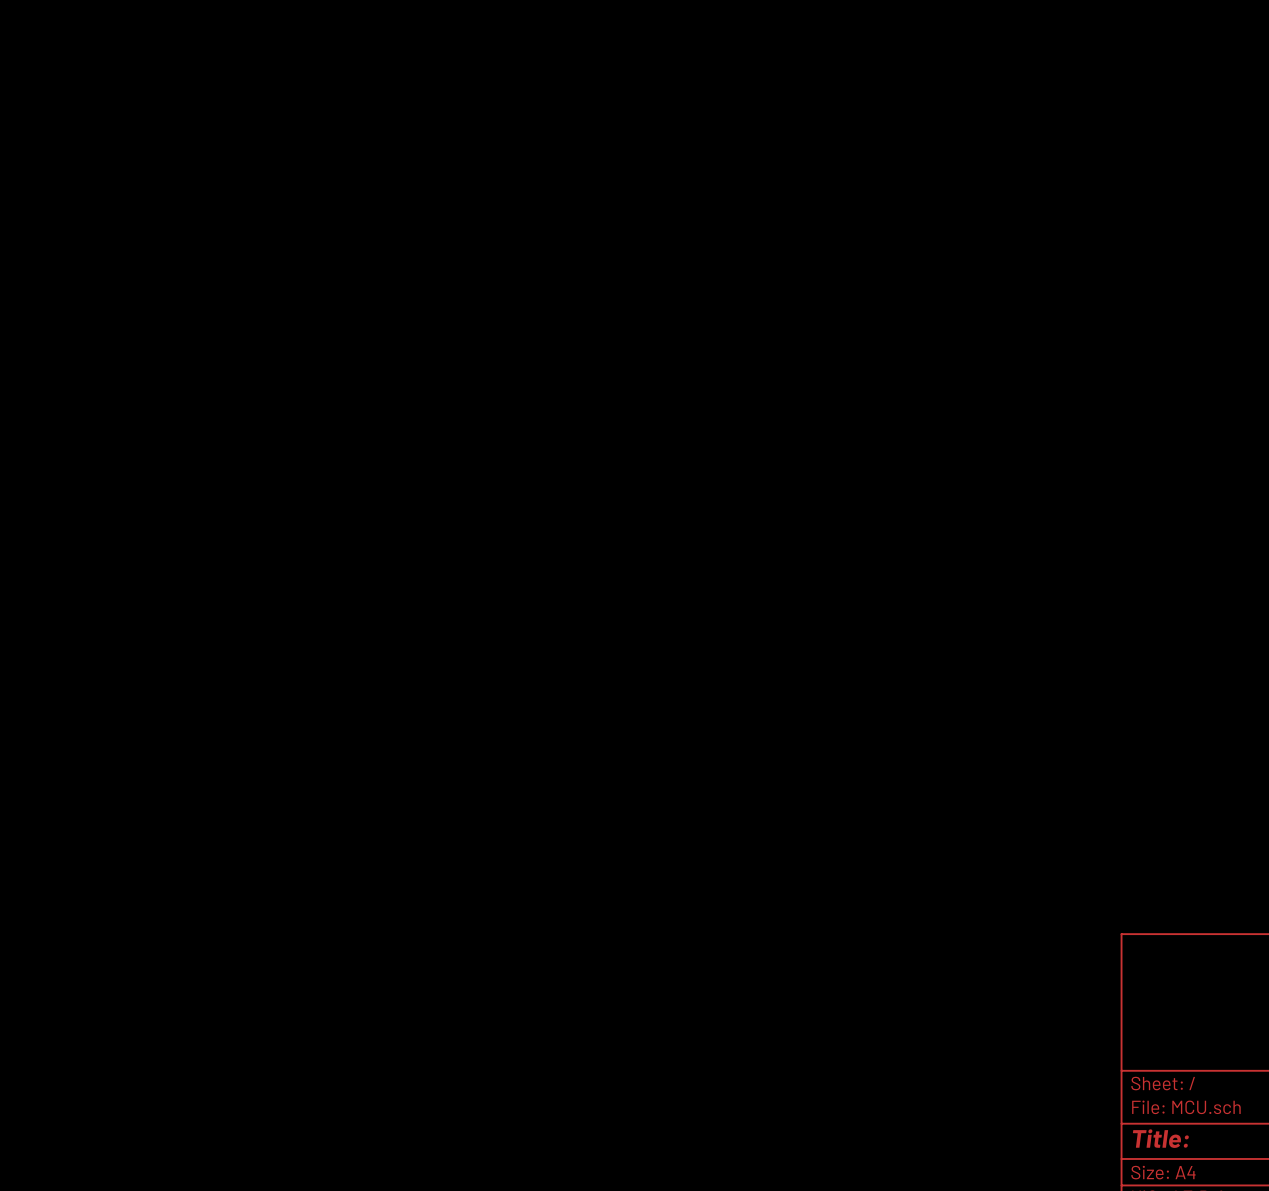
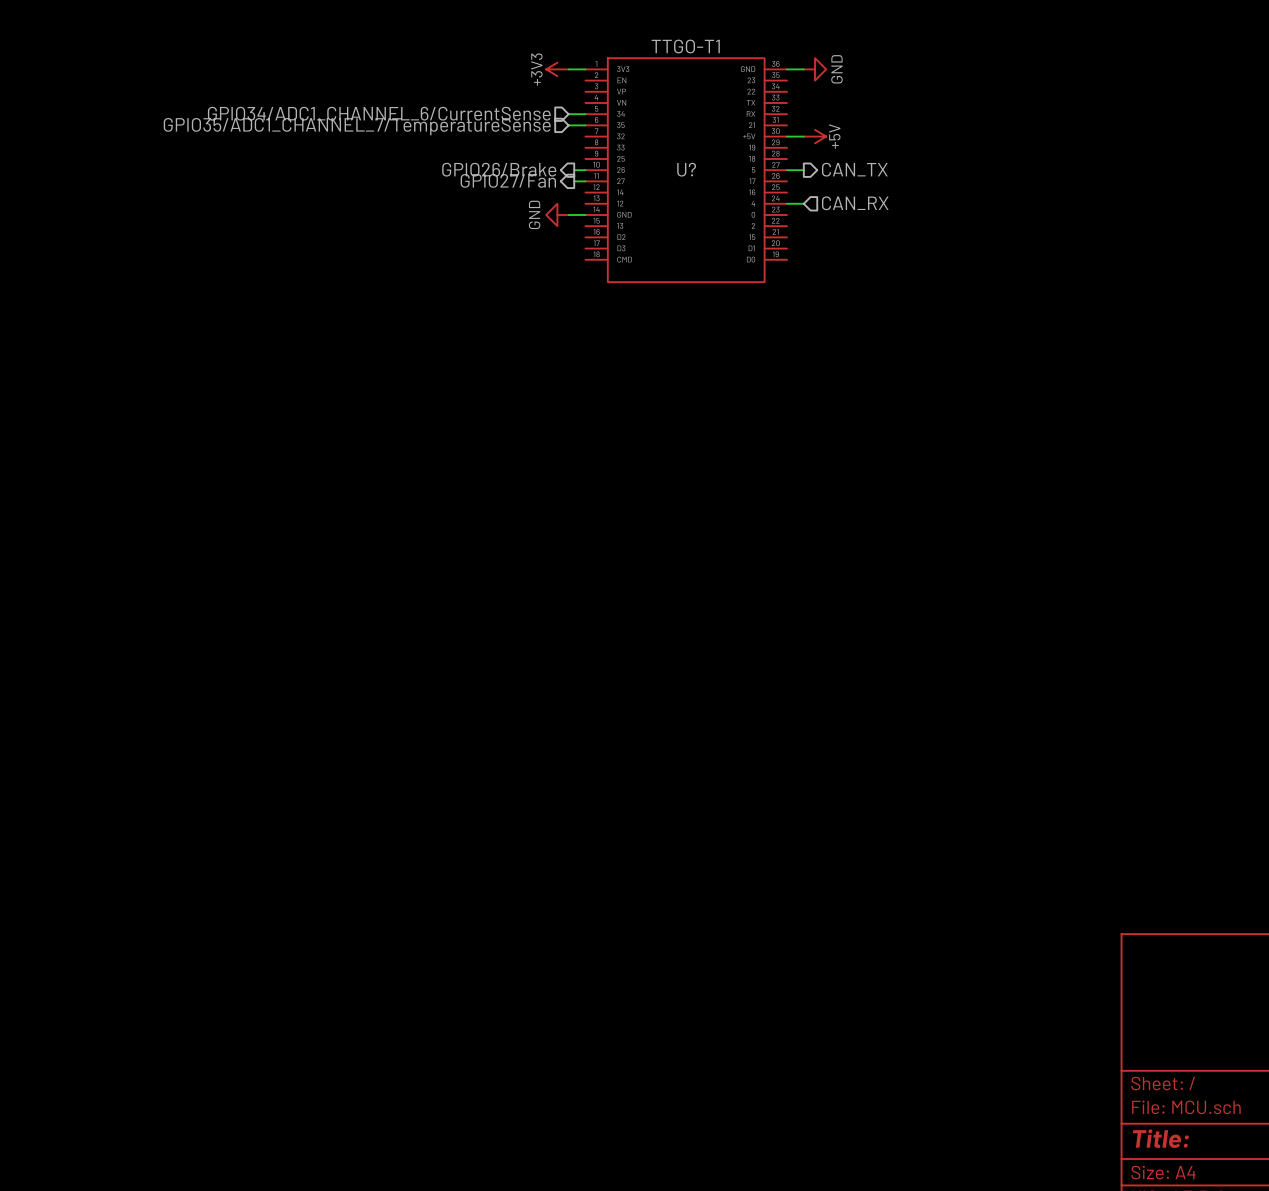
power symbol: none -> +3V3 (557, 69)
wire: none -> (568, 69) (585, 69)
wire: none -> (787, 69) (803, 69)
power symbol: none -> GND (815, 69)
hierarchical label: none -> GPIO34/ADC1_CHANNEL_6/CurrentSense (379, 113)
wire: none -> (568, 114) (585, 114)
wire: none -> (568, 125) (585, 125)
hierarchical label: none -> GPIO35/ADC1_CHANNEL_7/TemperatureSense (357, 126)
wire: none -> (787, 136) (803, 136)
power symbol: none -> +5V (815, 136)
hierarchical label: none -> GPIO26/Brake (499, 169)
hierarchical label: none -> CAN_TX (854, 169)
wire: none -> (574, 170) (585, 170)
U?: none -> TTGO-T1 (686, 170)
wire: none -> (787, 170) (803, 170)
hierarchical label: none -> GPIO27/Fan (508, 180)
wire: none -> (574, 181) (585, 181)
wire: none -> (787, 203) (803, 203)
hierarchical label: none -> CAN_RX (855, 203)
power symbol: none -> GND (557, 214)
wire: none -> (568, 214) (585, 214)

